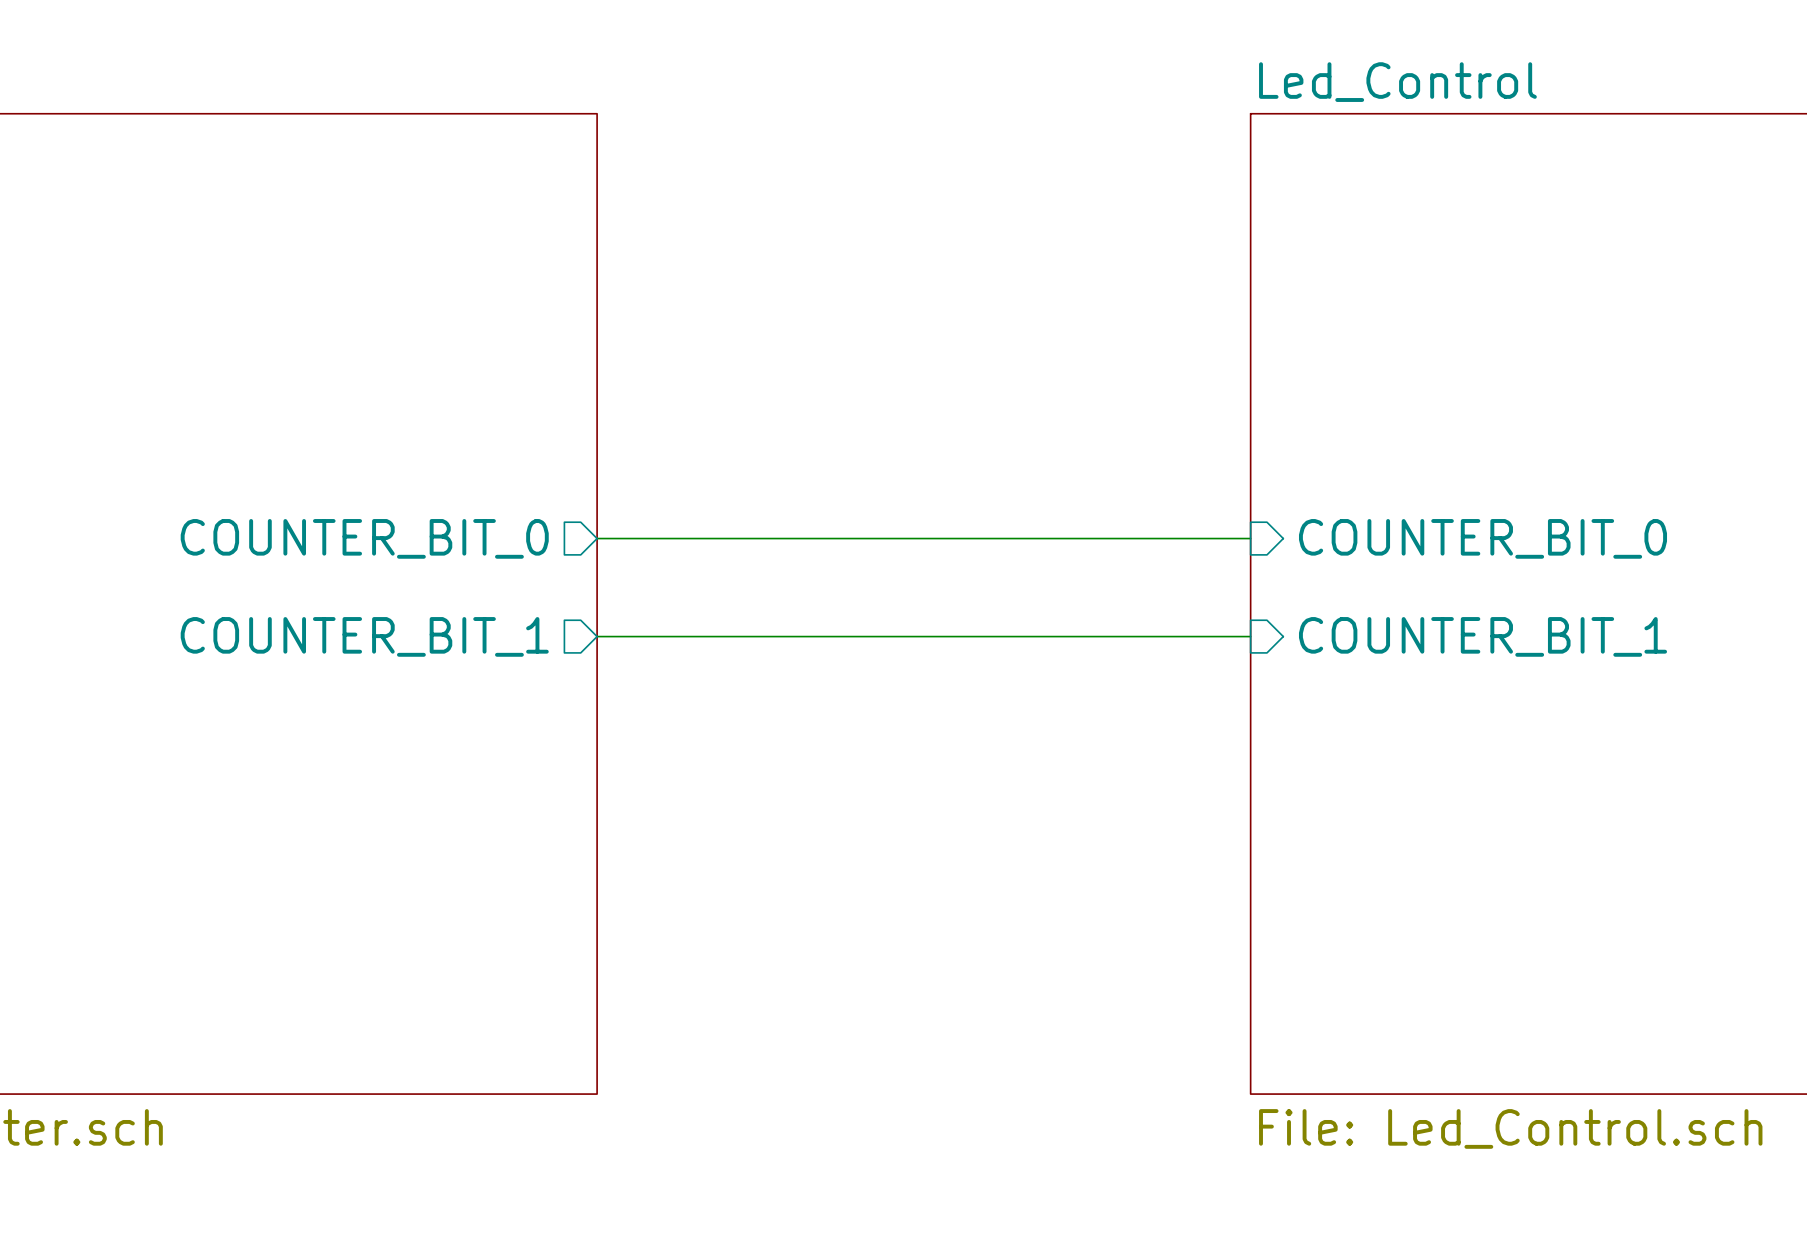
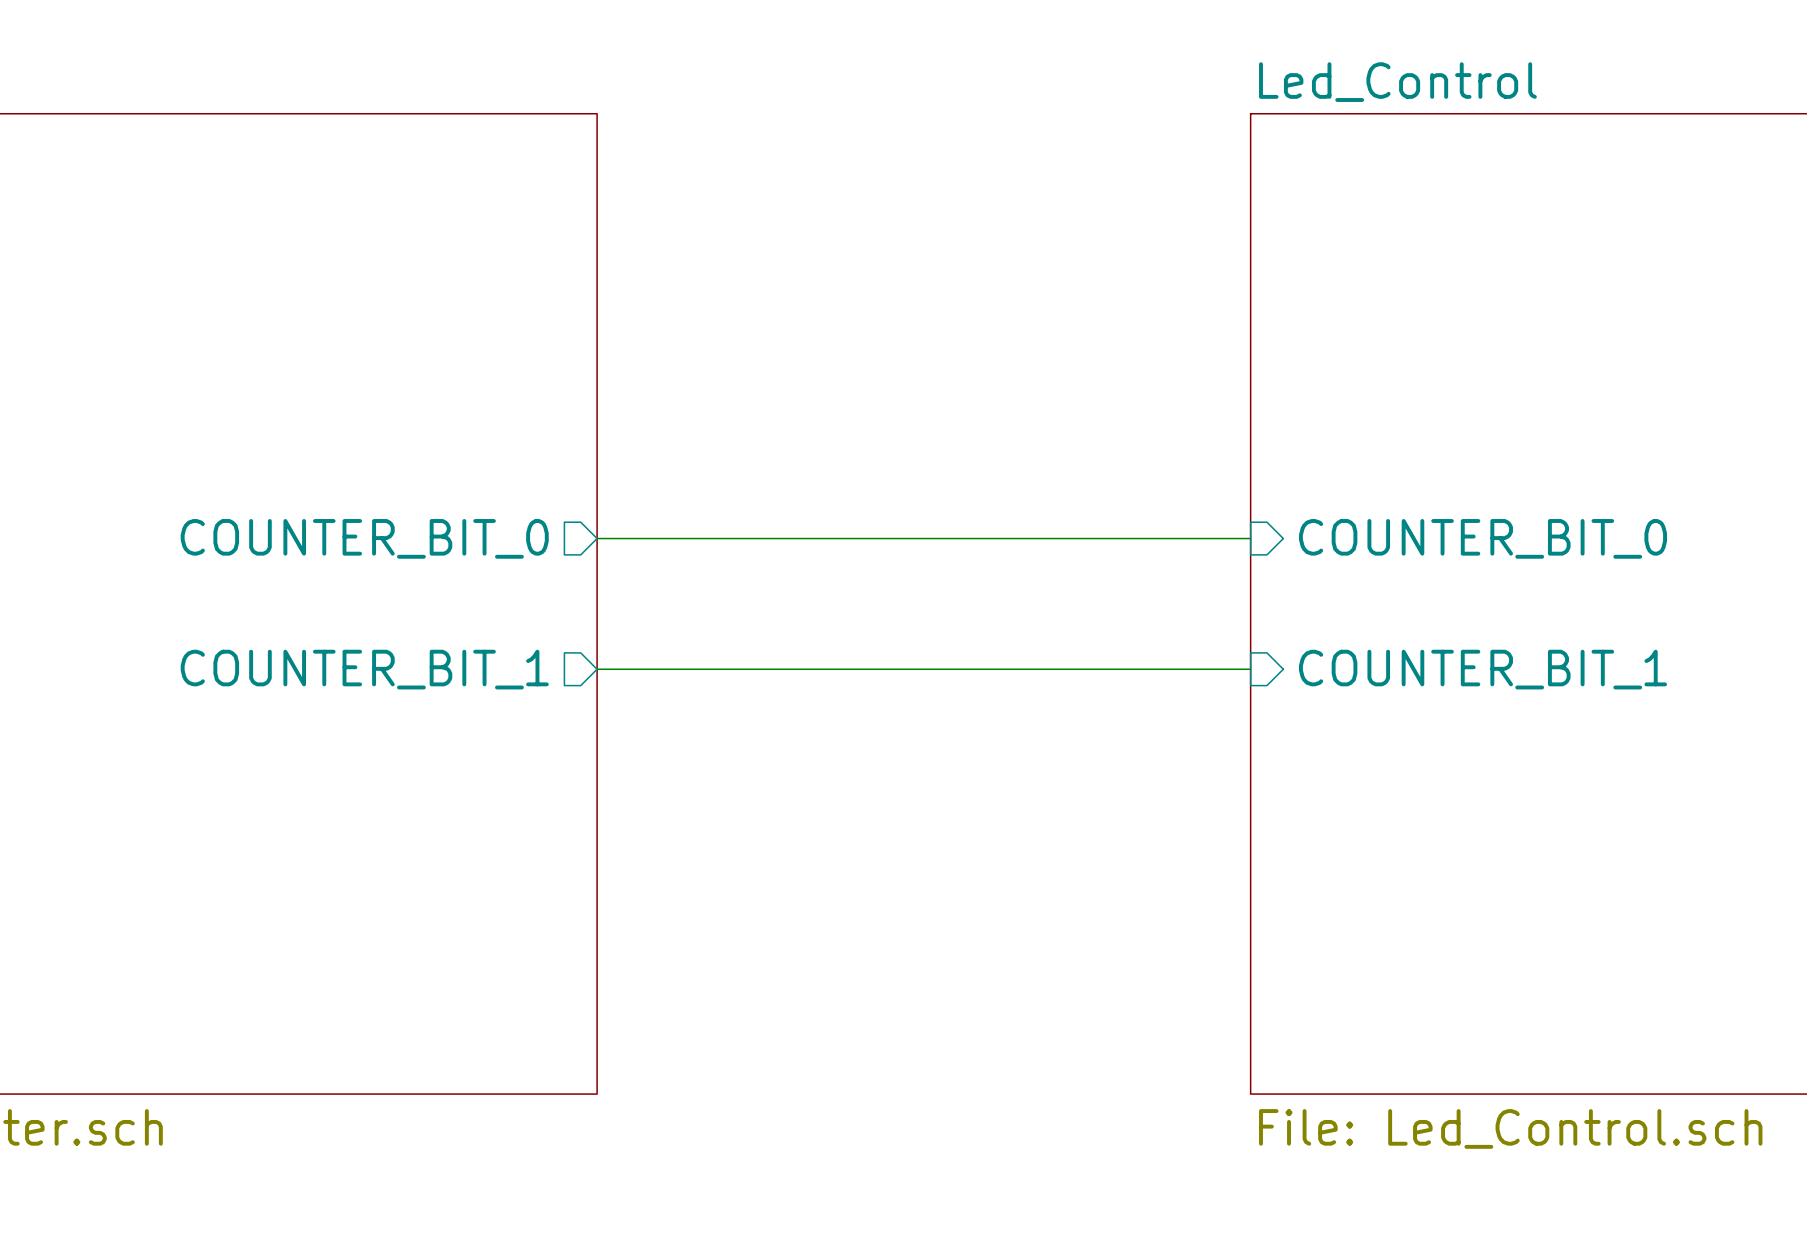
sheet pin position: COUNTER_BIT_1 (364, 636) -> COUNTER_BIT_1 (364, 669)
wire: (597, 636) (1250, 636) -> (597, 669) (1250, 669)
sheet pin position: COUNTER_BIT_1 (1483, 636) -> COUNTER_BIT_1 (1483, 669)

